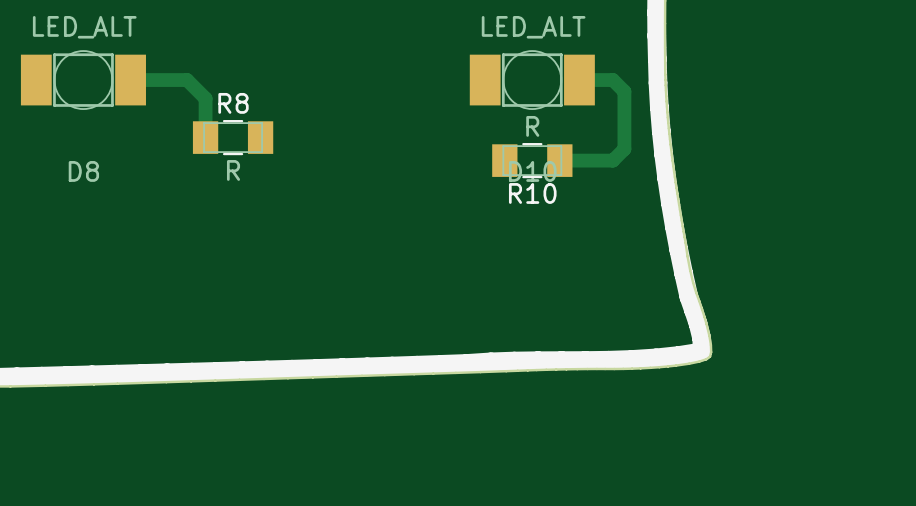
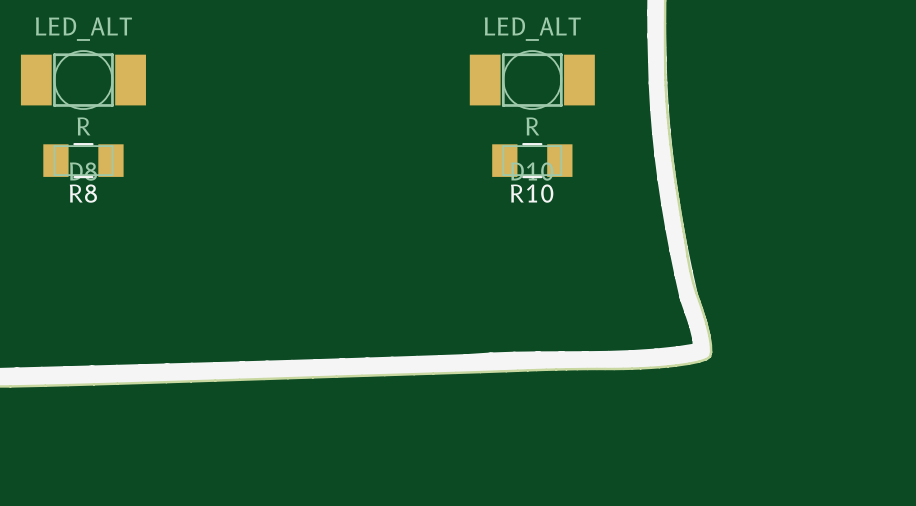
track: (130, 80) (187, 80) (205, 98) (205, 137) -> none
track: (579, 80) (612, 80) (624, 91) (624, 149) (612, 160) (559, 160) -> none
R8 name position: R8 (233, 103) -> R8 (83, 193)
R8 position: (233, 137) -> (83, 160)
R8 value position: R (233, 170) -> R (83, 126)

